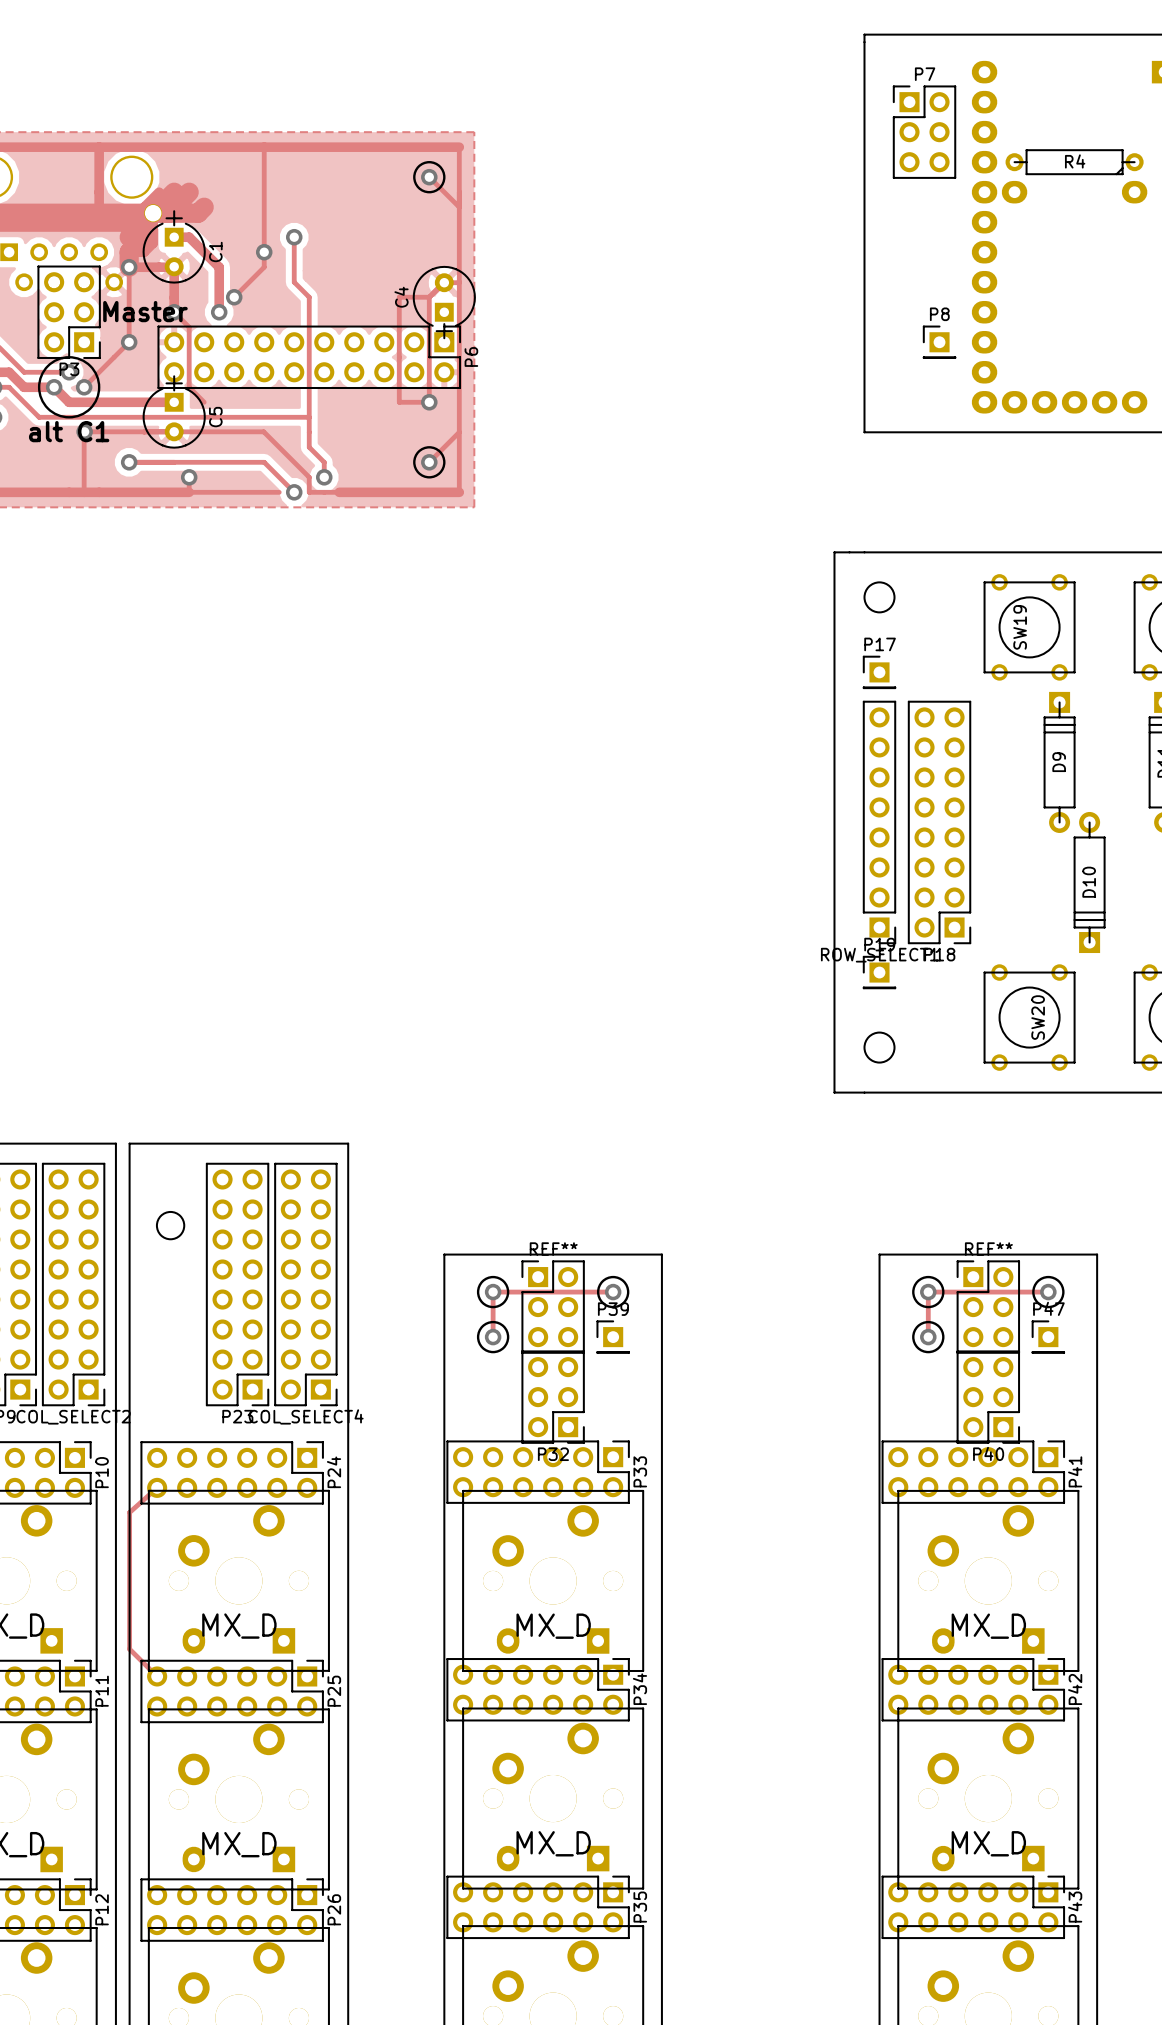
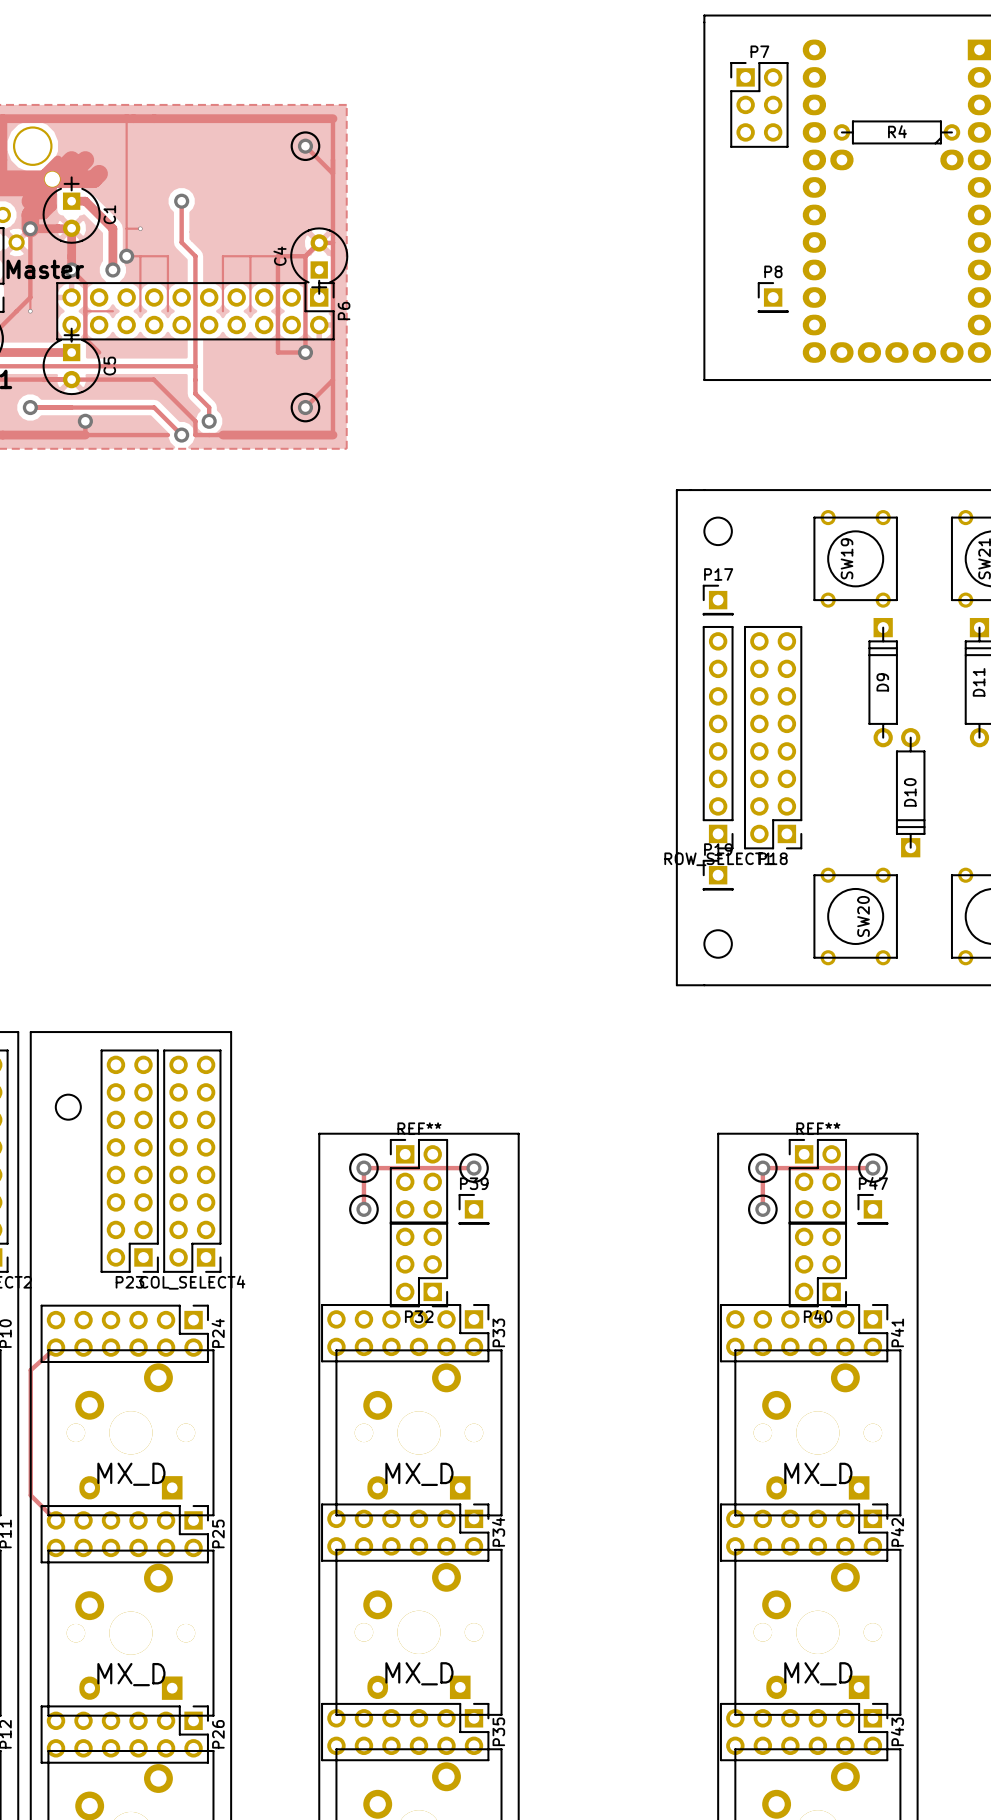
track: none -> (126, 118) (126, 256) (167, 256) (167, 311)
track: (264, 147) (264, 267) (234, 297) -> none
via: (264, 252) -> none
track: none -> (126, 228) (140, 228)
via: none -> (140, 228)
track: none -> (140, 256) (140, 311)
track: none -> (250, 256) (250, 311)
track: none -> (277, 256) (222, 256) (222, 311)
track: none -> (30, 297) (30, 311)
via: (129, 342) -> none
via: none -> (30, 311)
track: none -> (85, 311) (112, 311)

